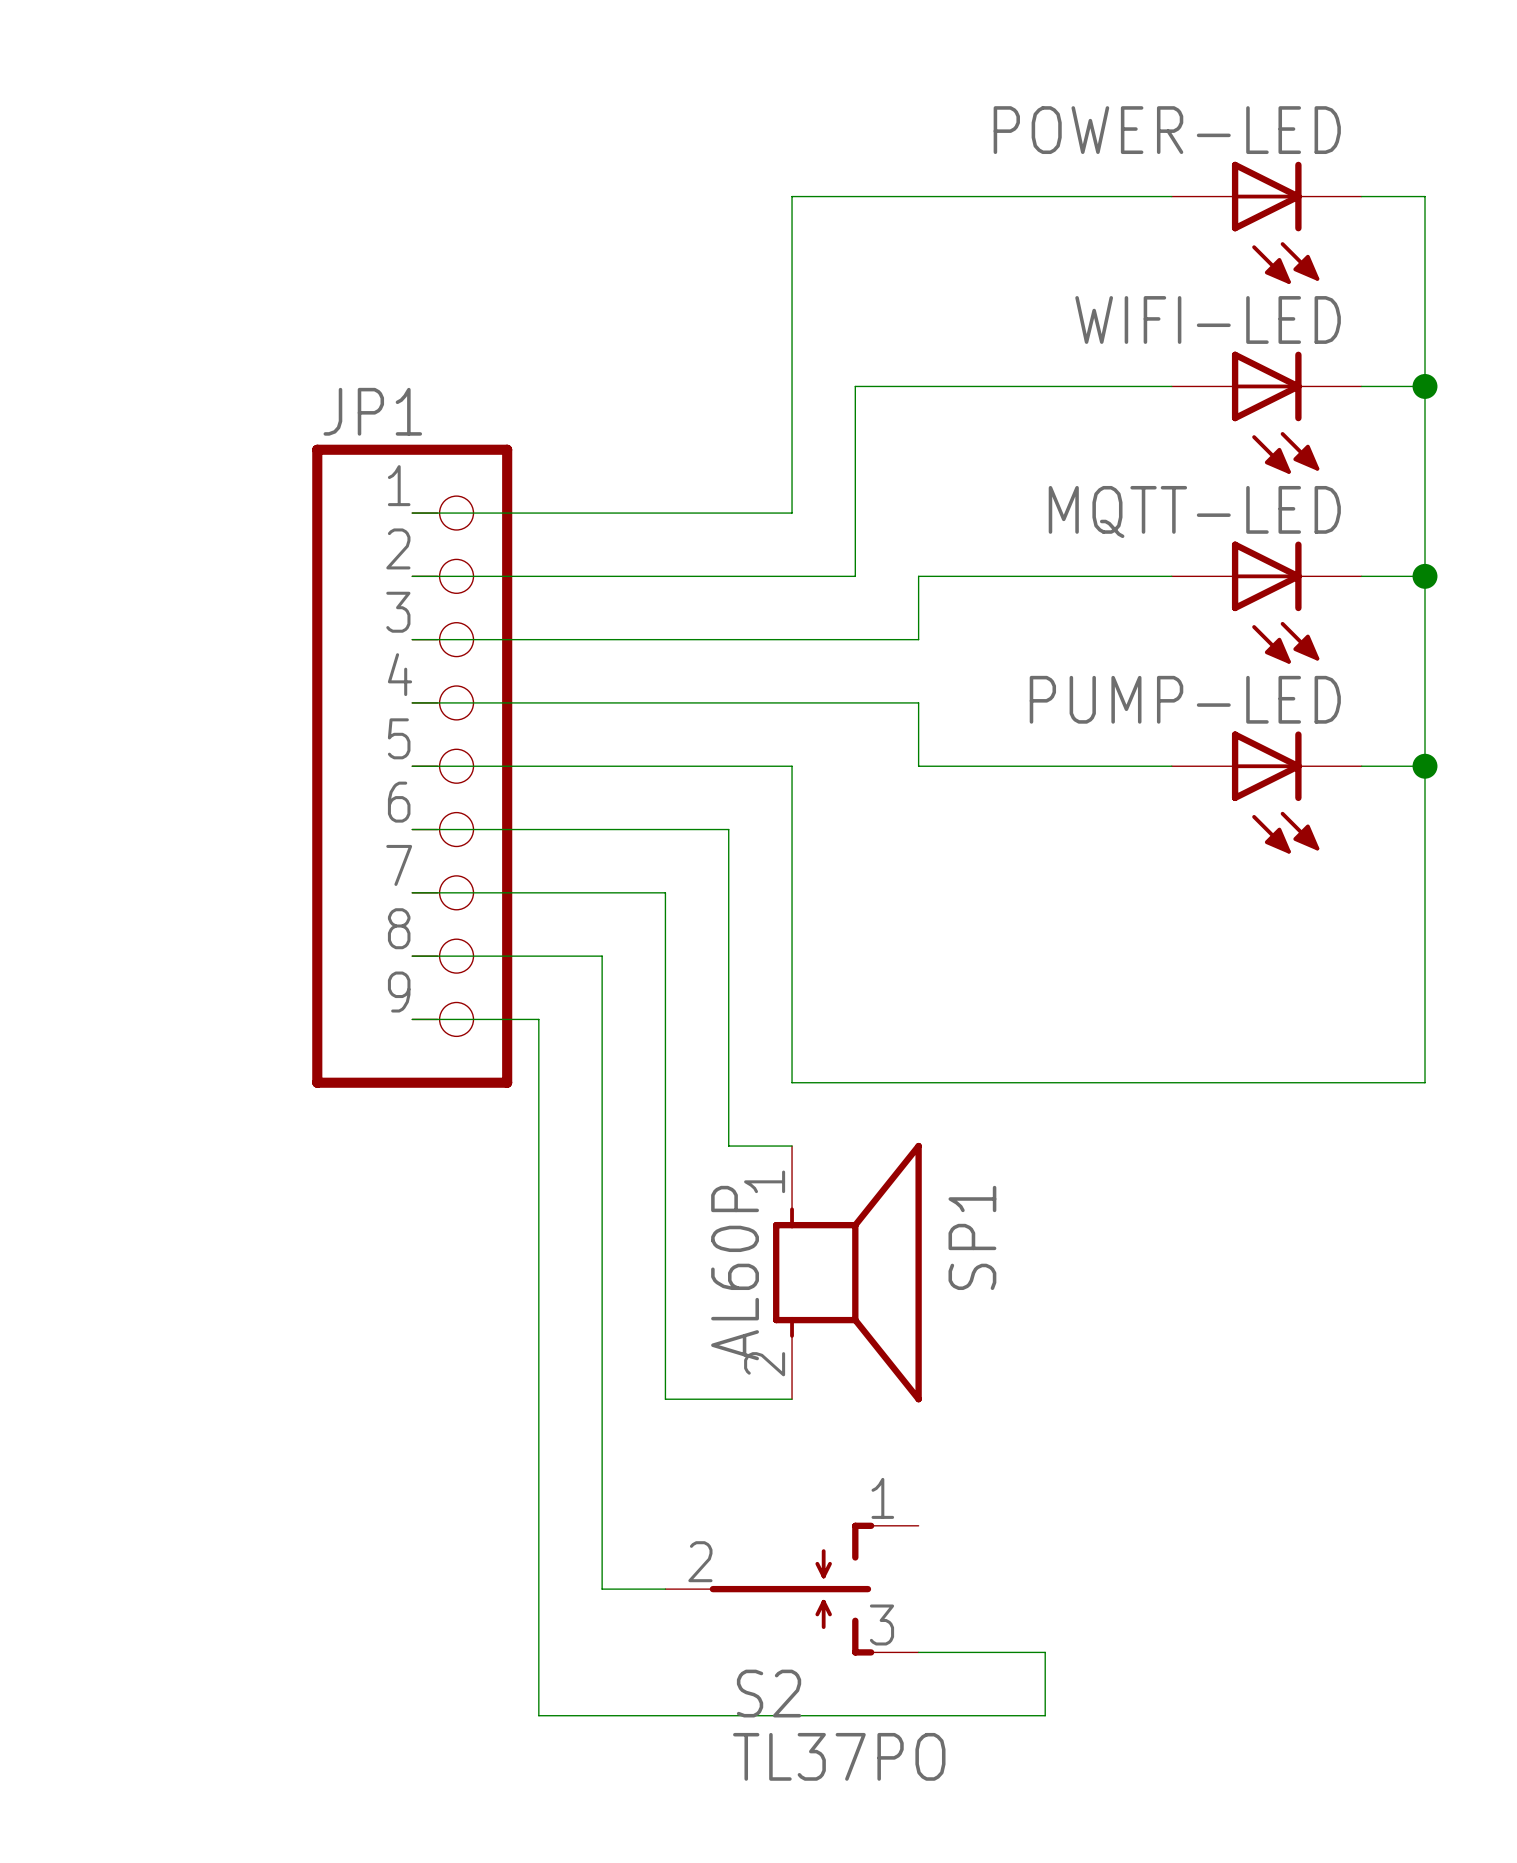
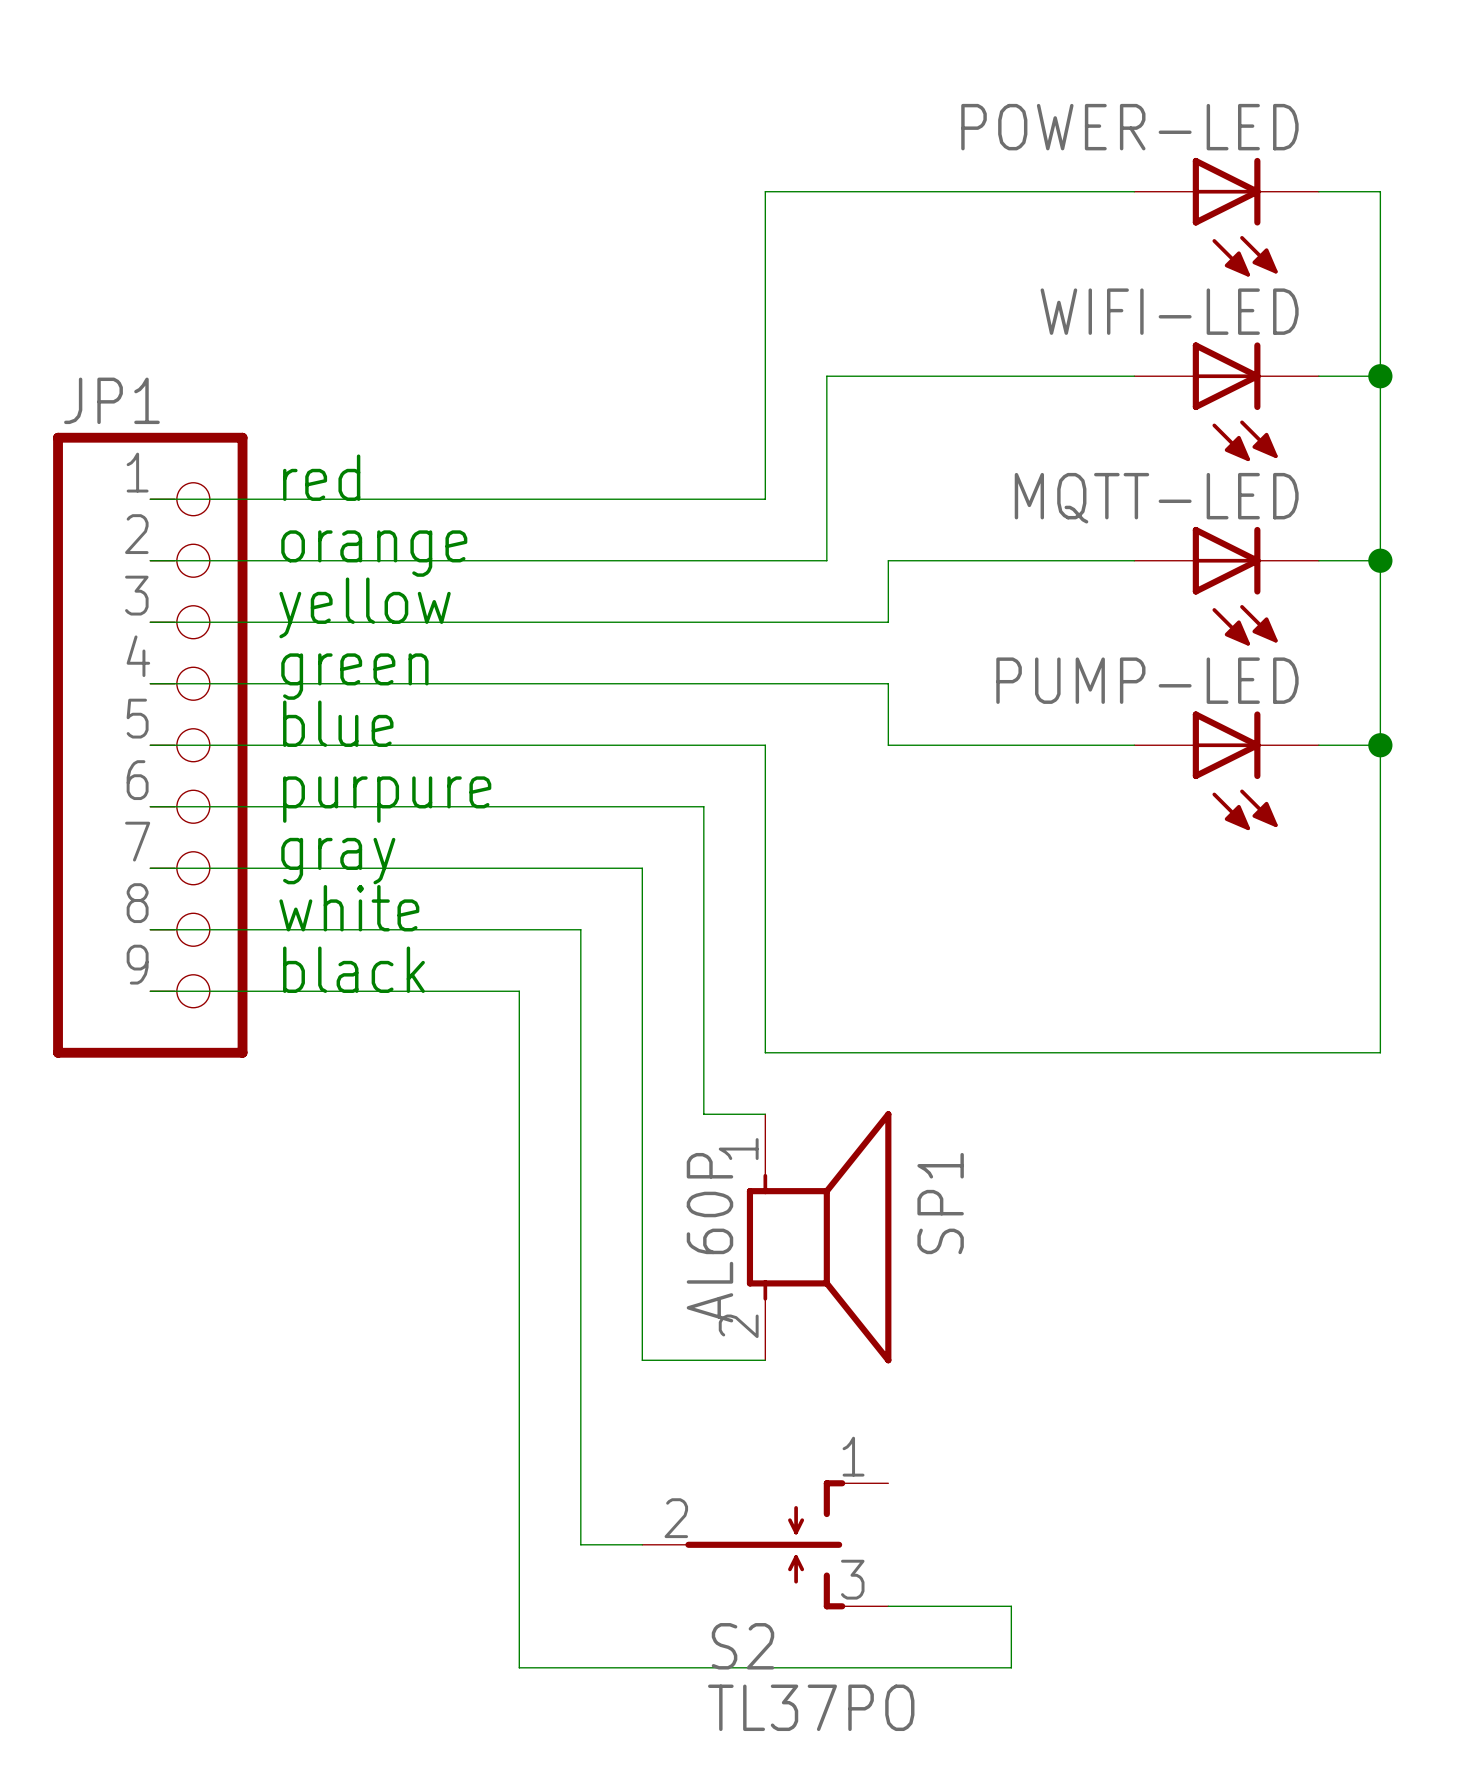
text: none -> red (321, 477)
wire: none -> (150, 499) (396, 499)
text: none -> orange (374, 553)
wire: none -> (150, 560) (396, 560)
text: none -> yellow (365, 607)
wire: none -> (150, 622) (396, 622)
text: none -> green (354, 676)
wire: none -> (150, 683) (396, 683)
text: none -> blue (338, 723)
wire: none -> (150, 745) (396, 745)
JP1 position: (412, 766) -> (150, 745)
text: none -> purpure (387, 799)
wire: none -> (150, 806) (396, 806)
text: none -> gray (338, 861)
wire: none -> (150, 868) (396, 868)
text: none -> white (349, 908)
wire: none -> (150, 929) (396, 929)
text: none -> black (353, 969)
wire: none -> (150, 991) (396, 991)

